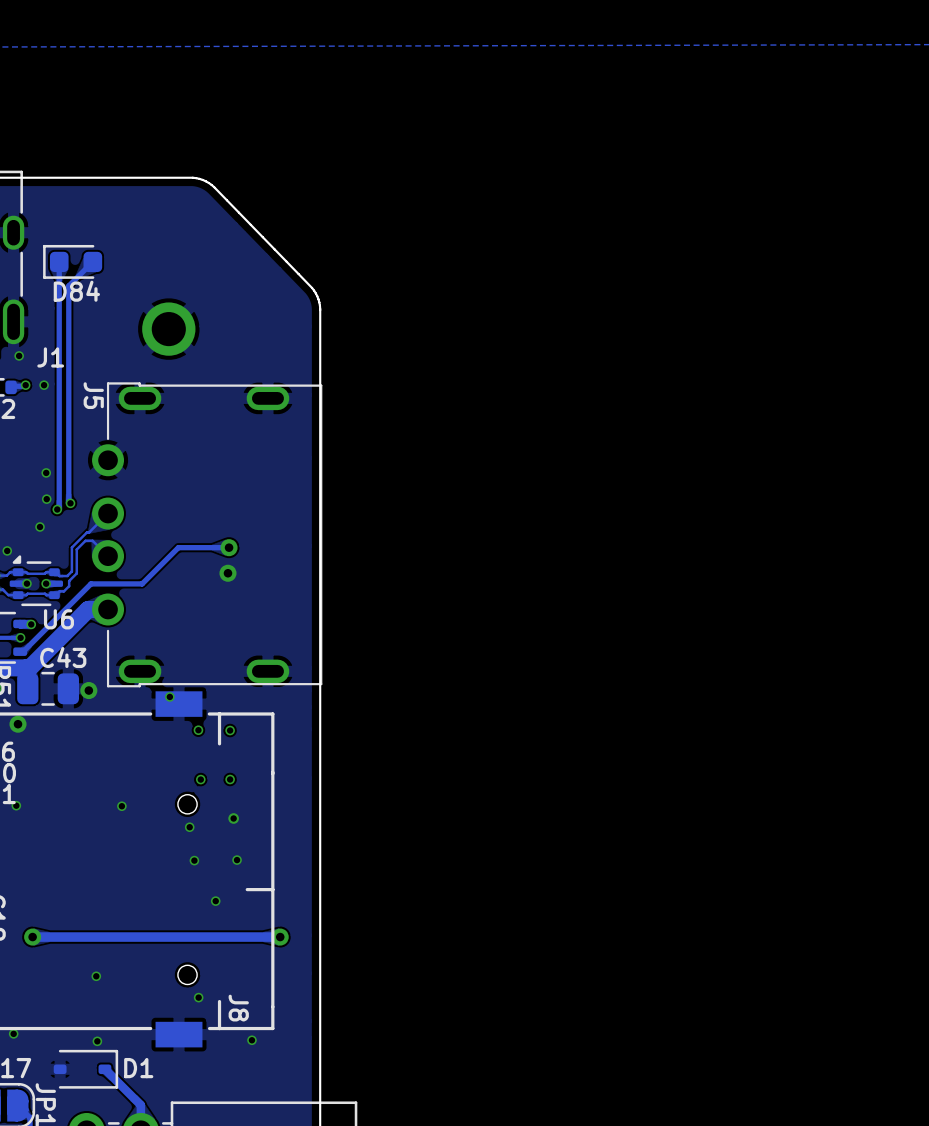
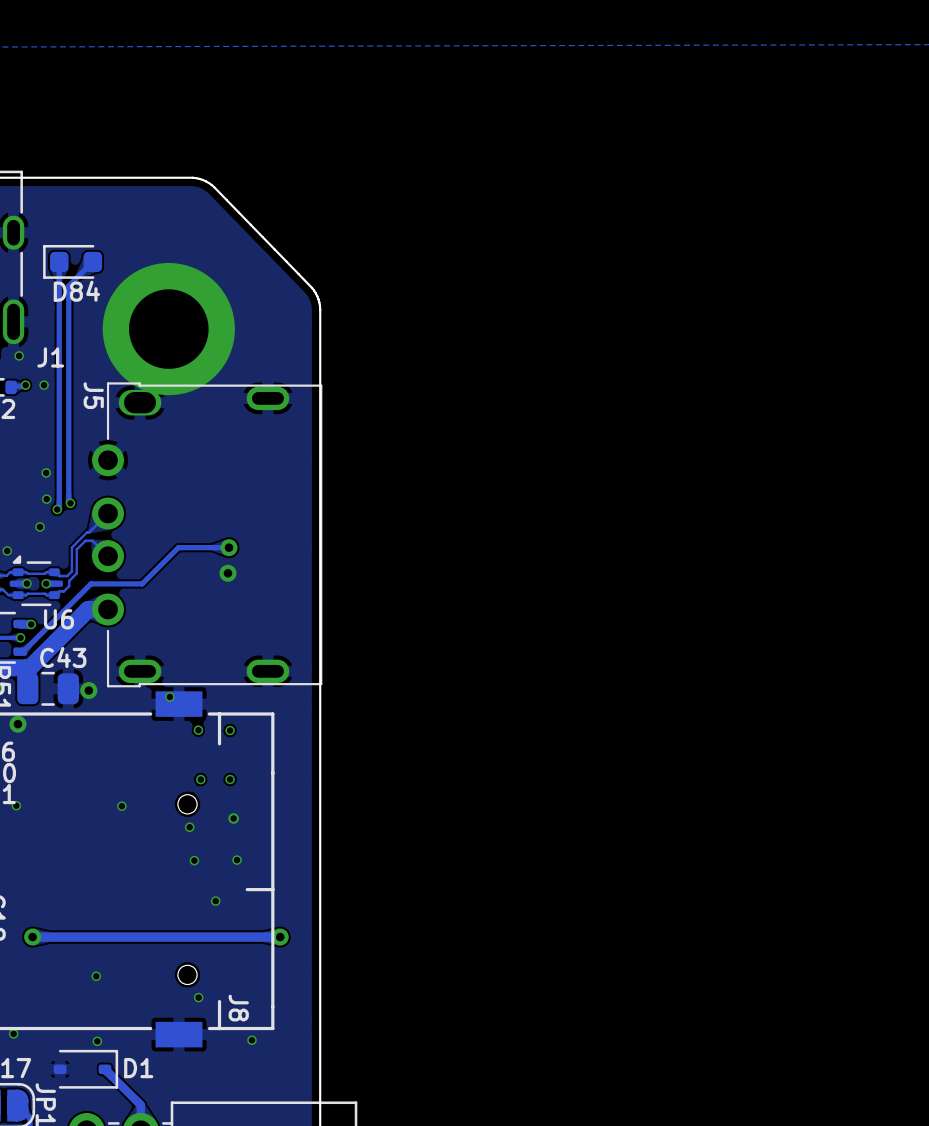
part footprint: [142, 302, 196, 356] -> [102, 262, 235, 396]
J5 footprint: [92, 382, 323, 688] -> [92, 382, 323, 688]

